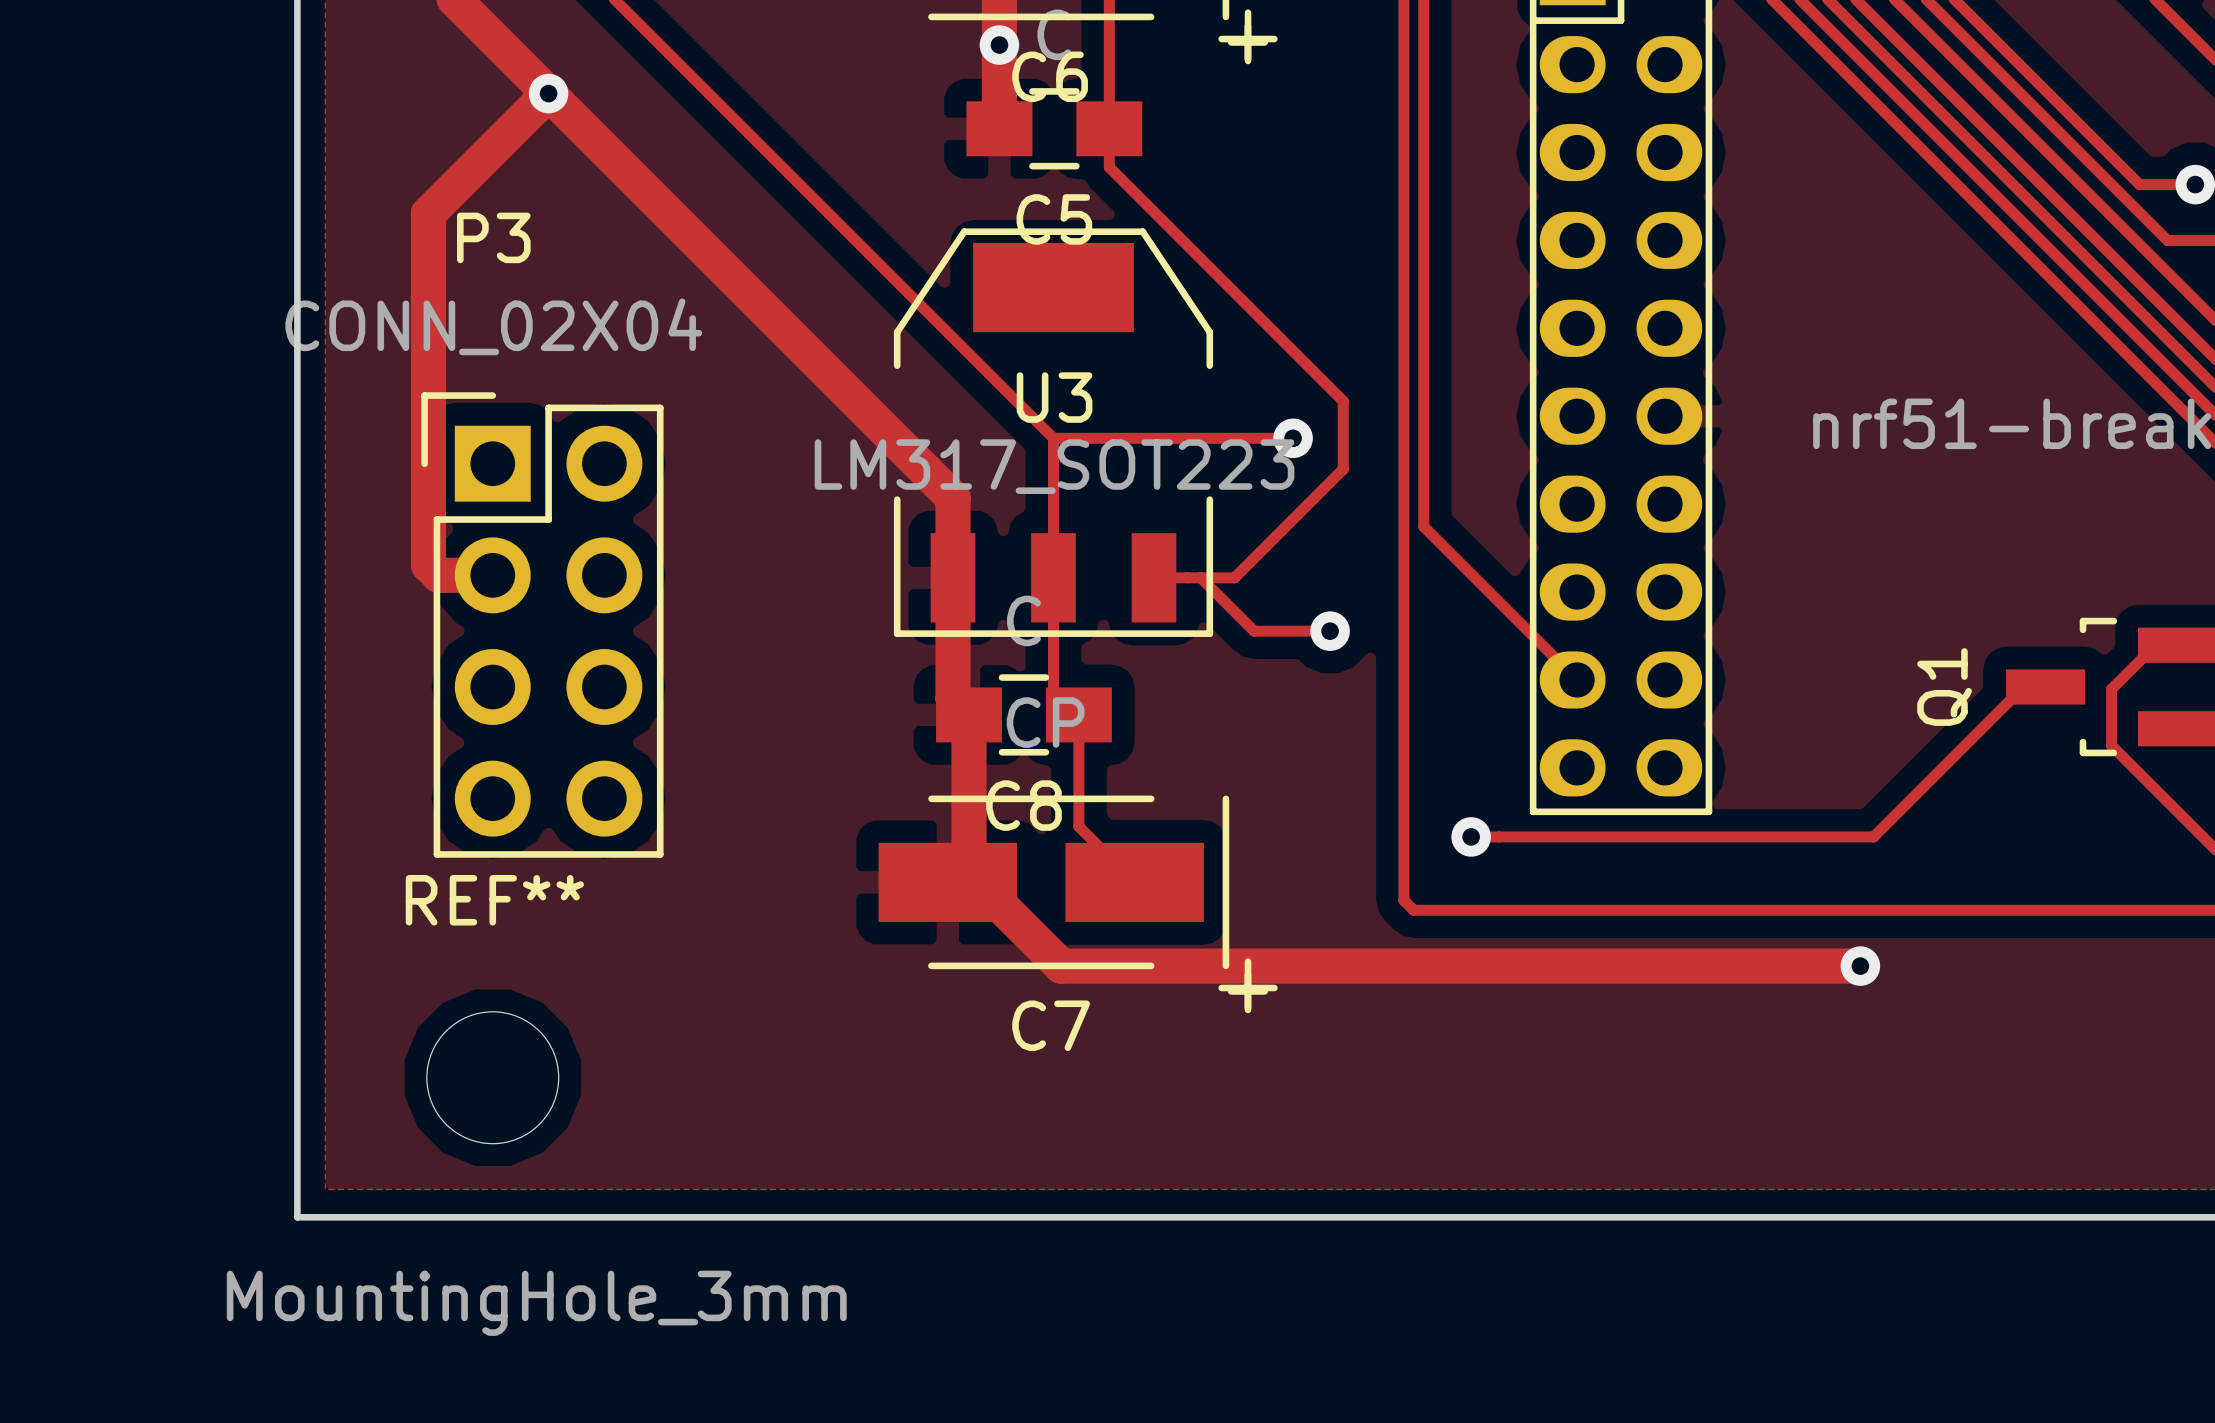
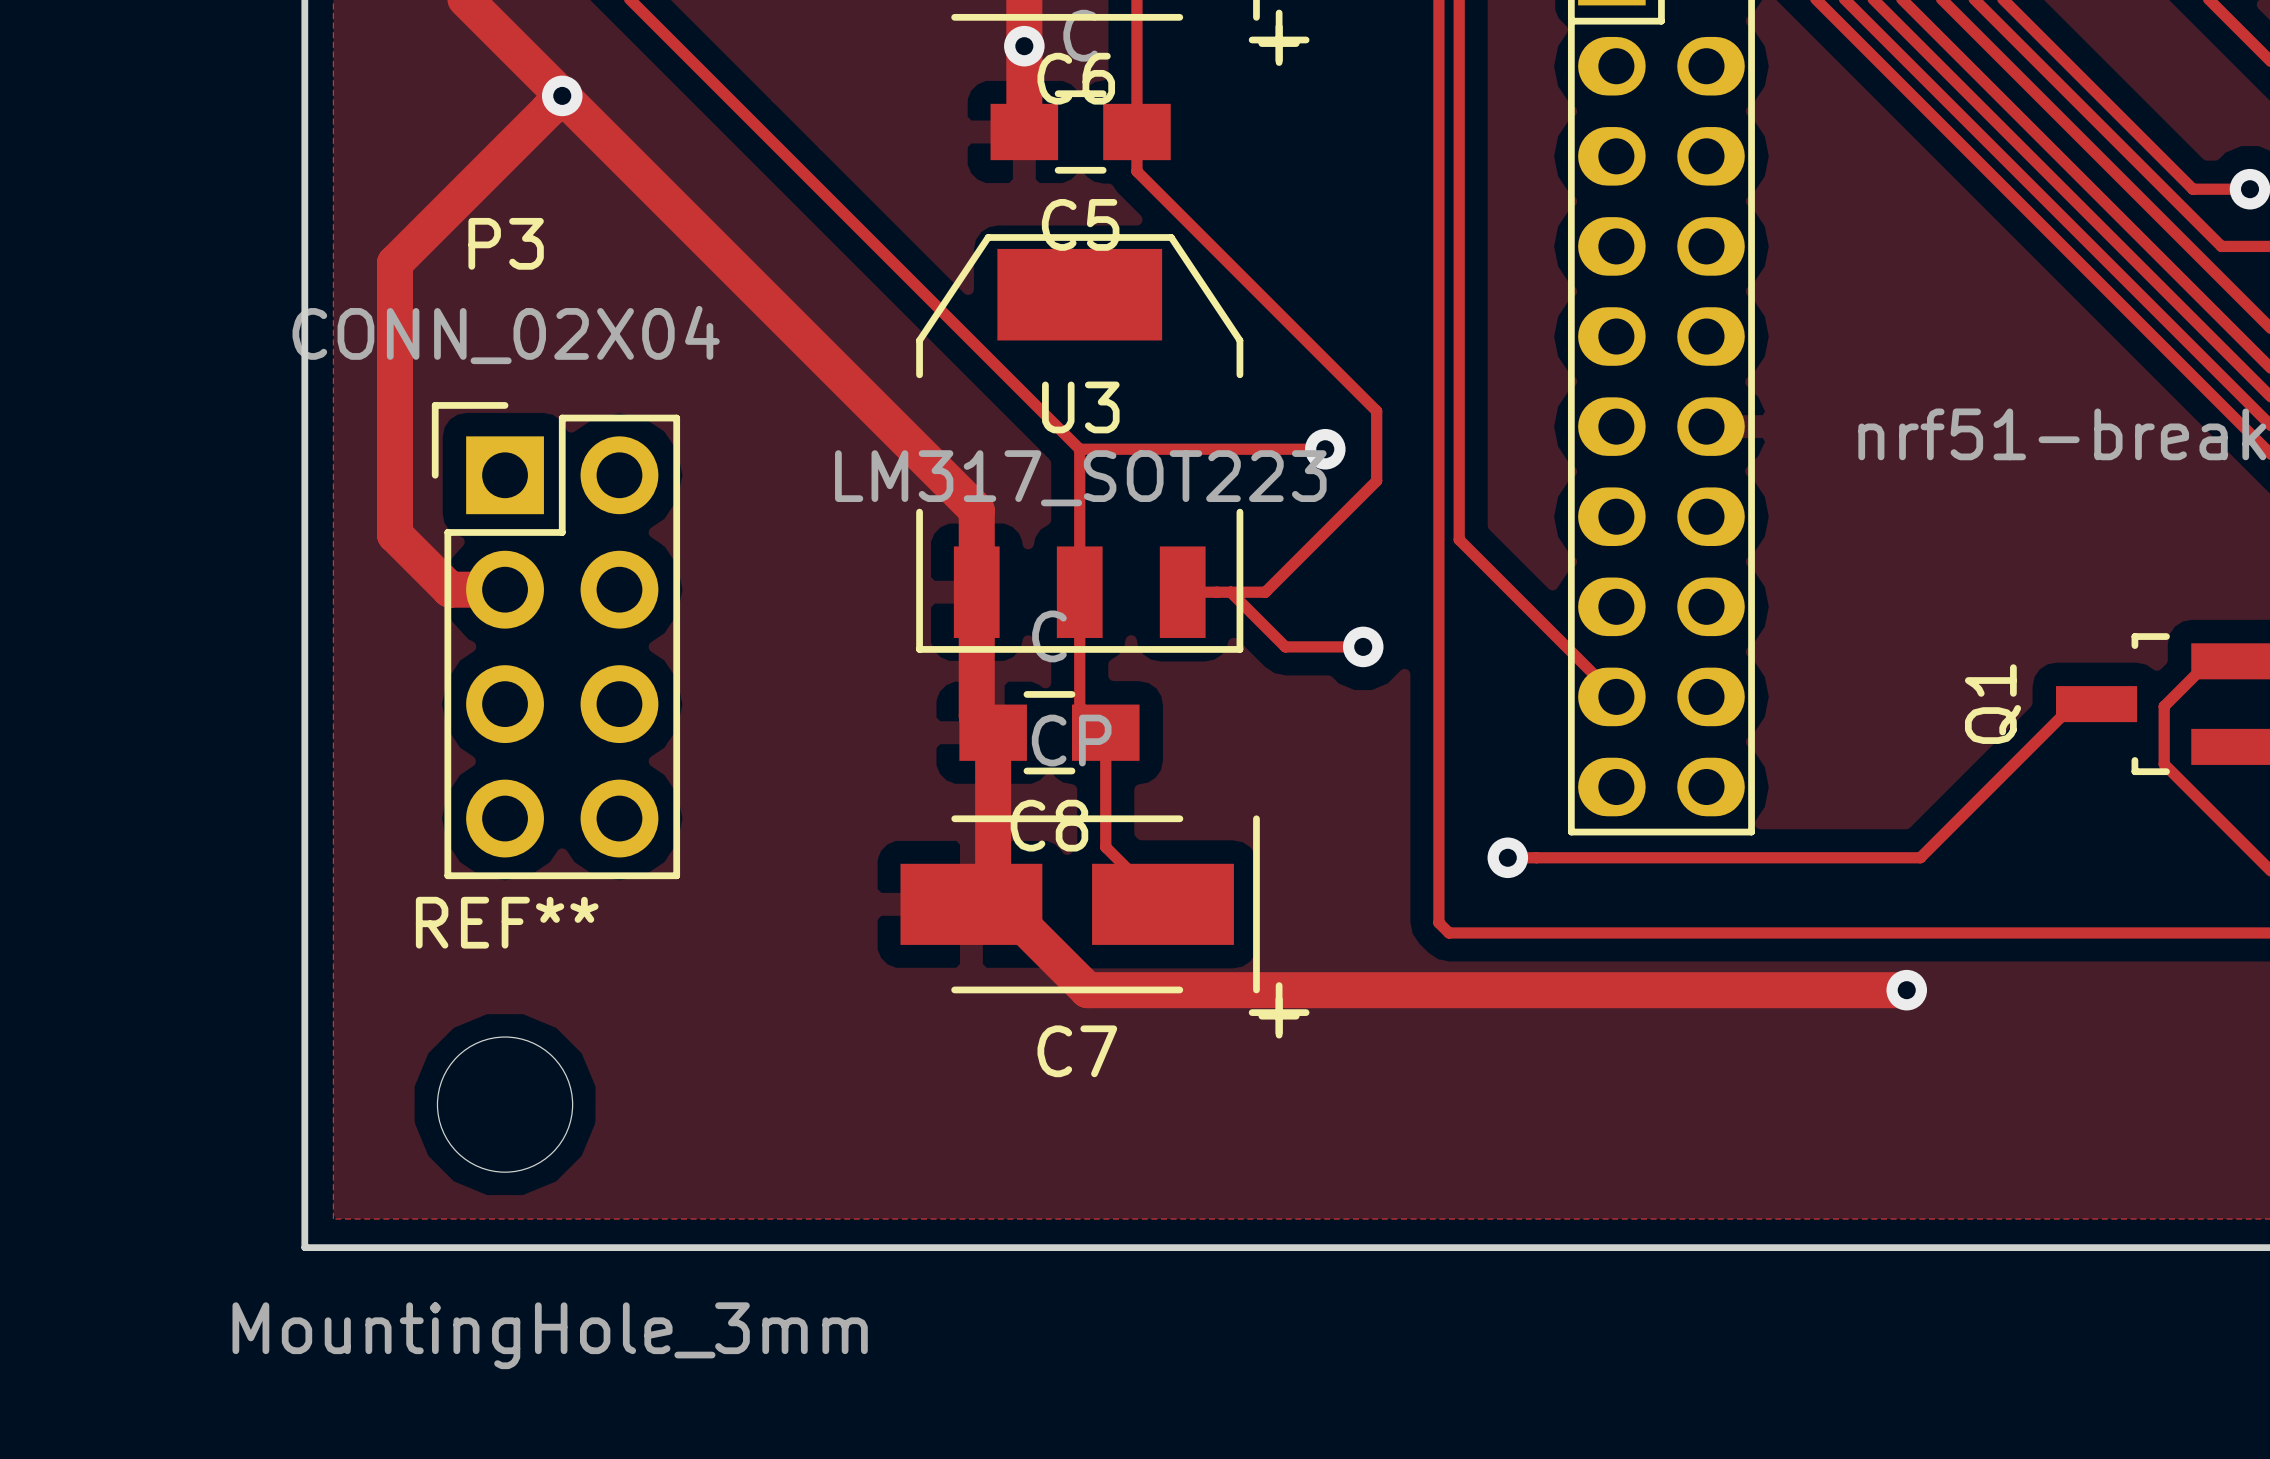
track: (428, 213) (428, 564) -> (439, 219) (395, 263) (395, 534) (439, 578)

